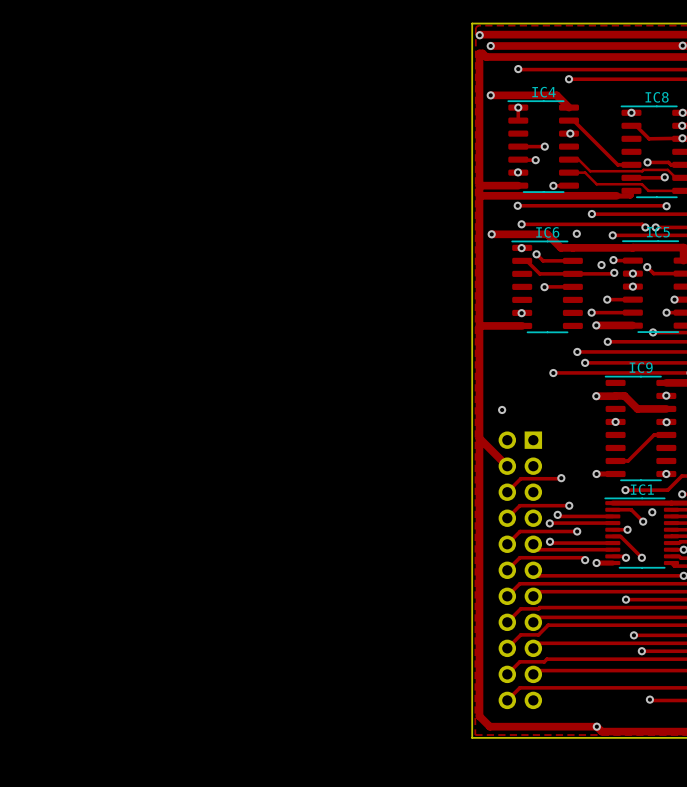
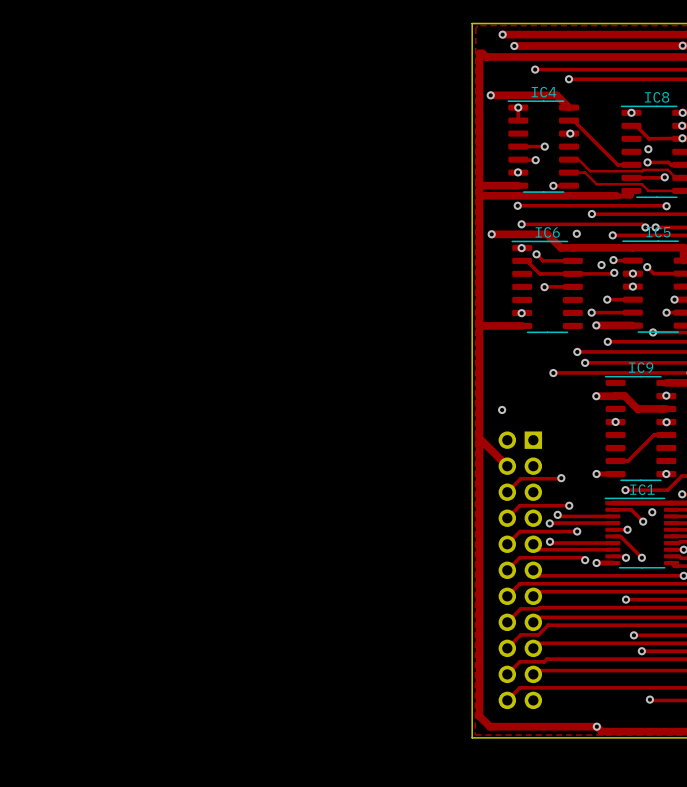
track: (502, 34) (479, 35) -> none
via: none -> (502, 34)
via: (479, 35) -> none
track: (490, 45) (514, 45) -> none
via: (490, 45) -> none
via: none -> (514, 45)
track: (518, 69) (535, 69) -> none
via: (518, 69) -> none
via: none -> (535, 69)
via: none -> (648, 149)

